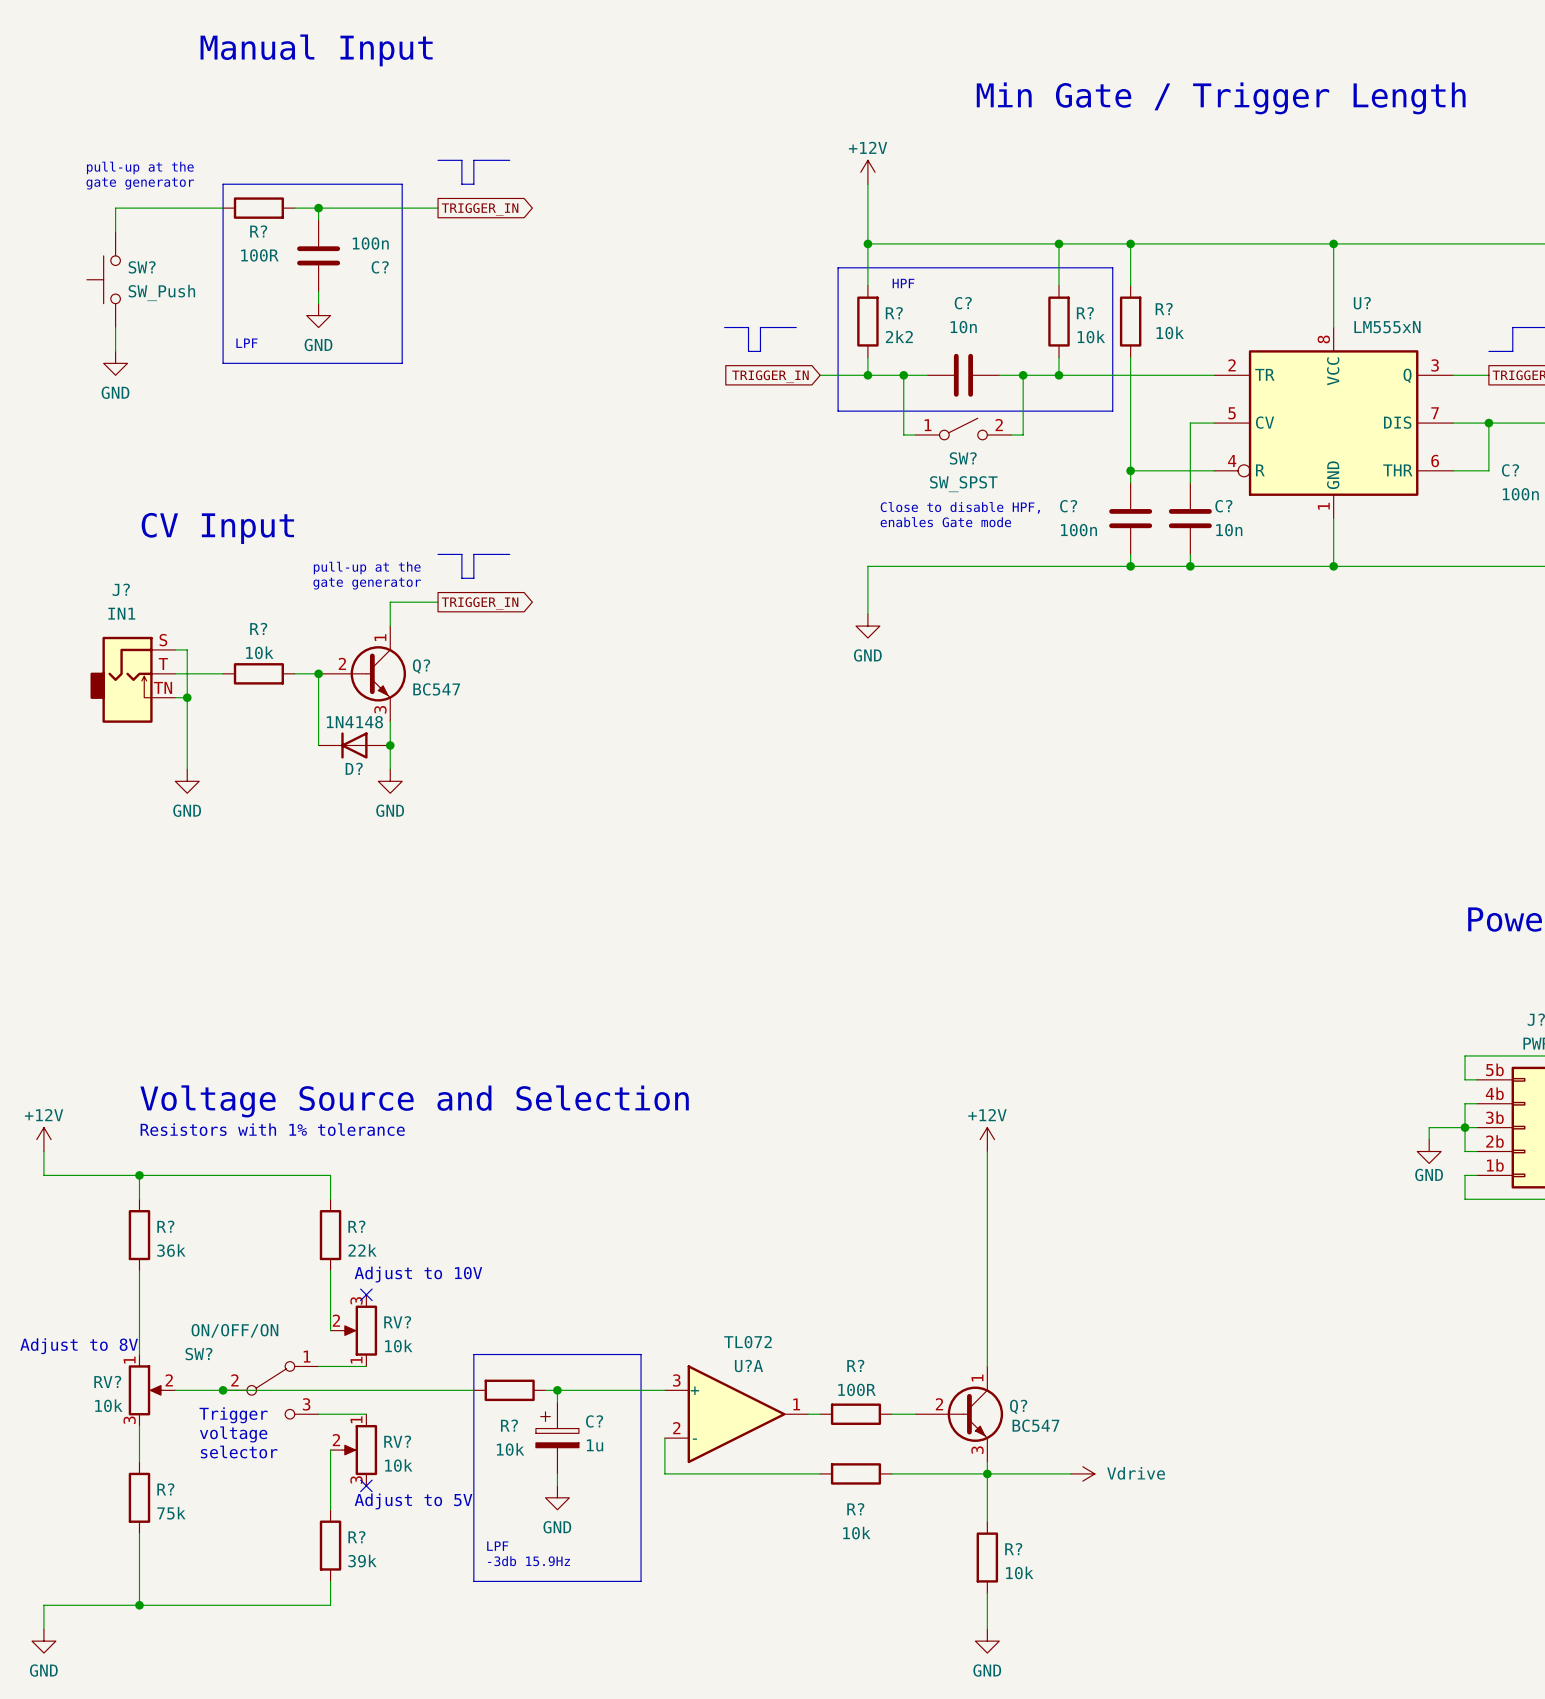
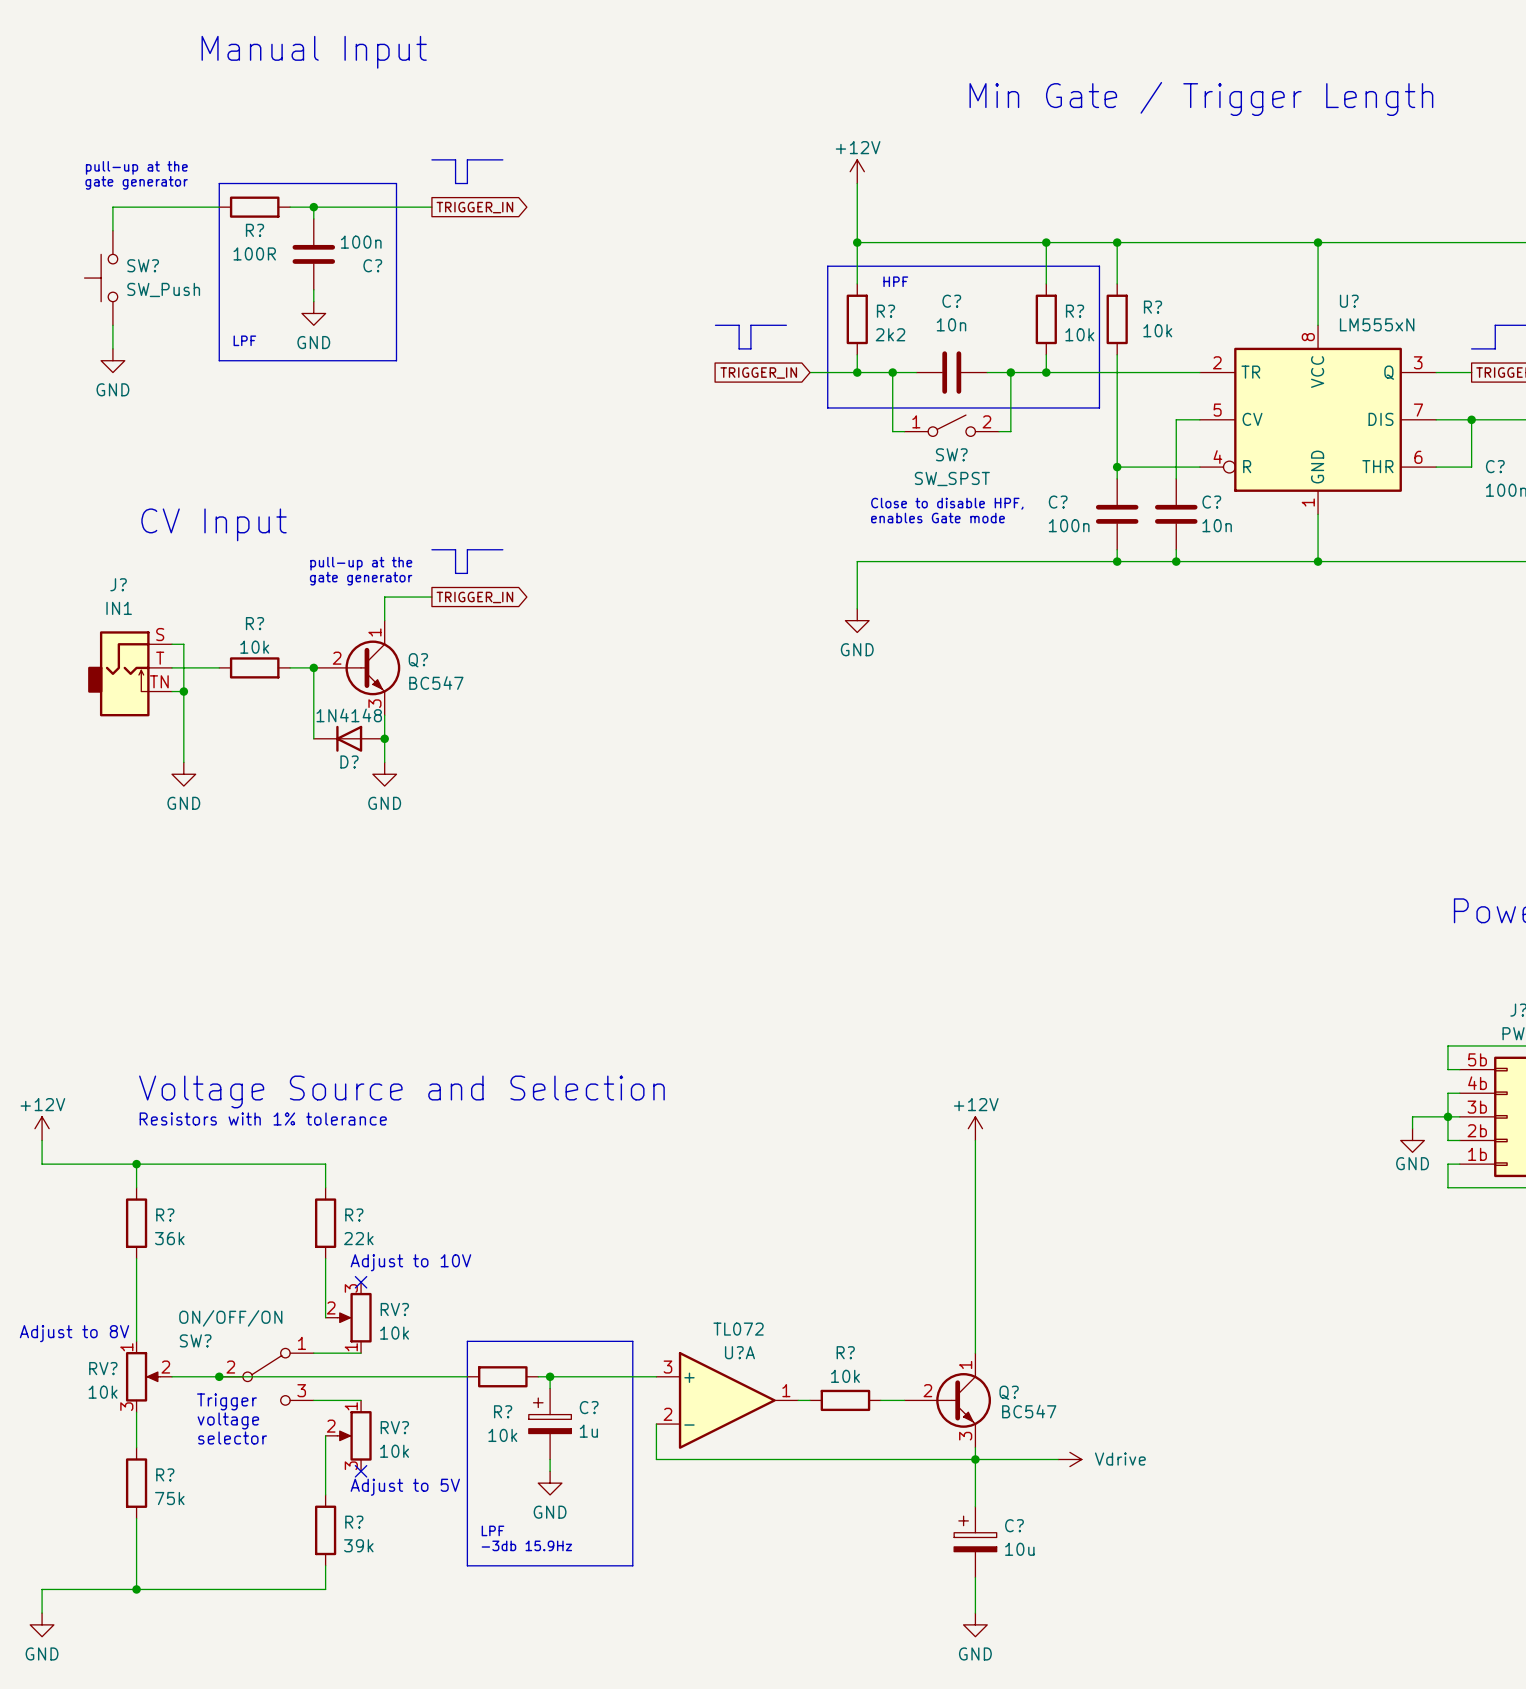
R? value: 100R (856, 1389) -> 10k (845, 1376)
wire: none -> (810, 1459) (880, 1459)
R?: 10k (855, 1473) -> none
R?: 10k (987, 1557) -> none
C?: none -> 10u (975, 1542)

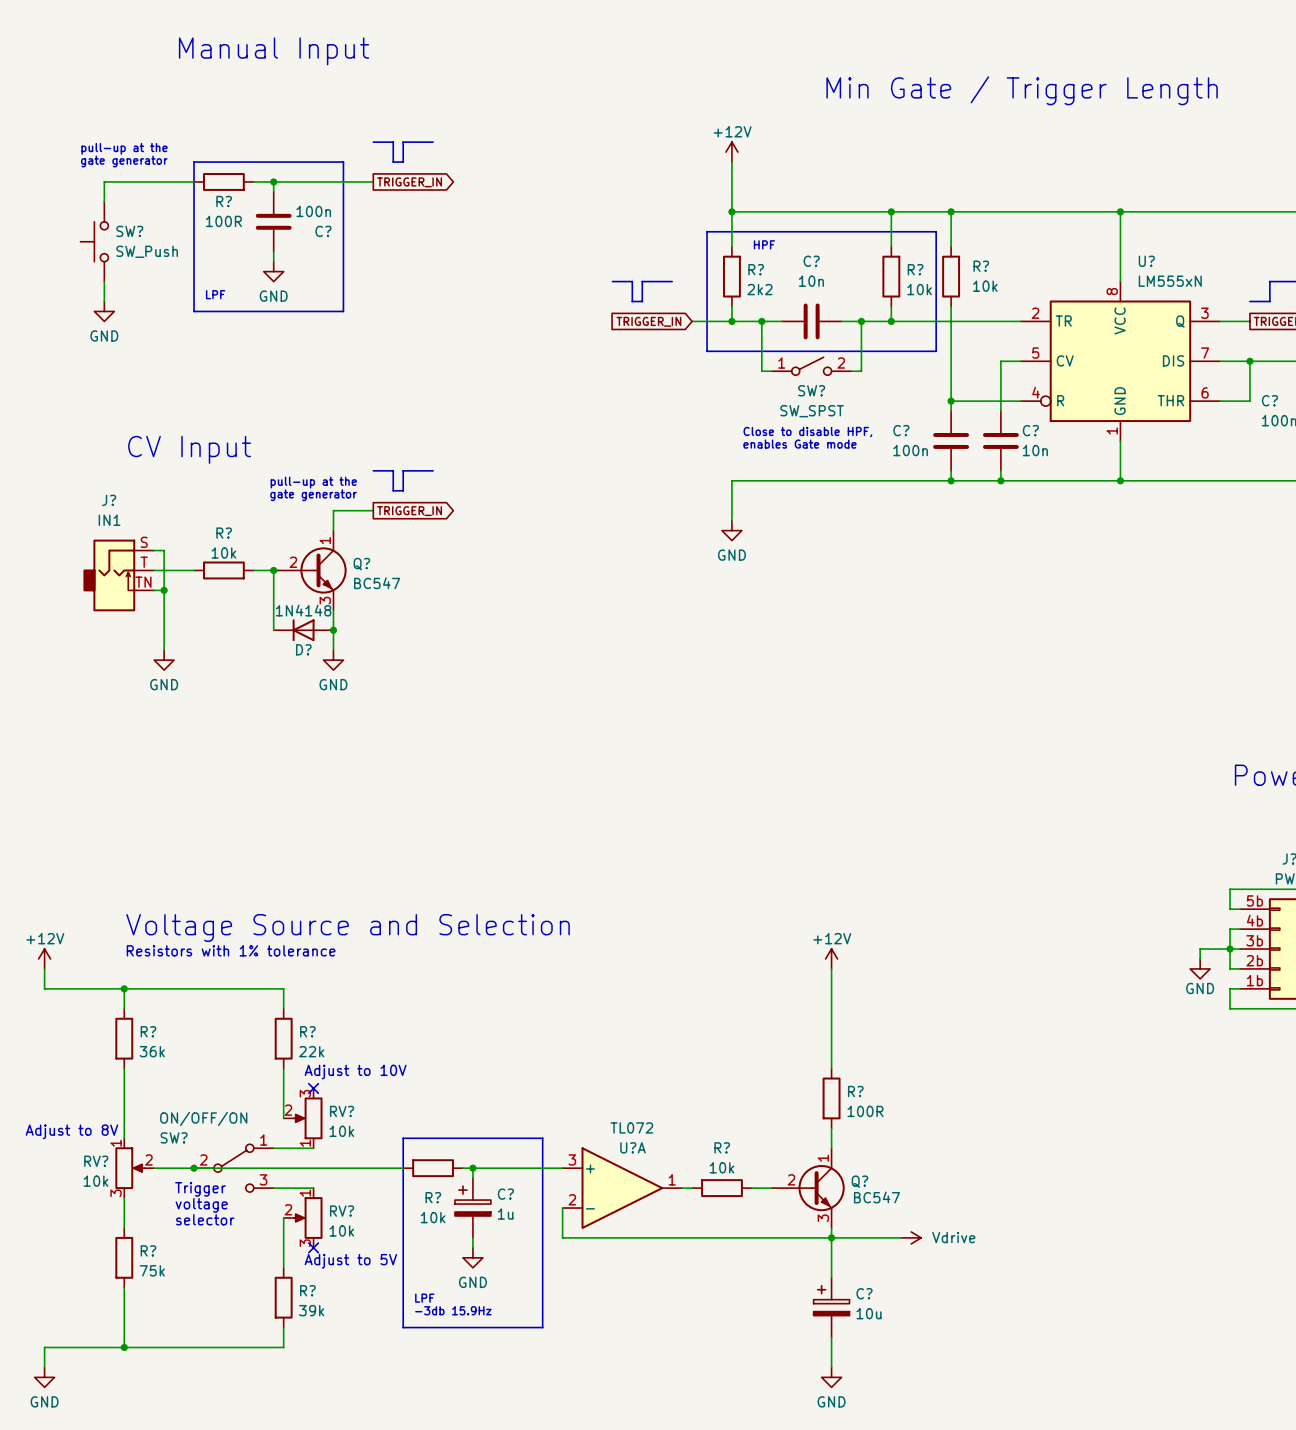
wire: (975, 1258) (975, 1329) -> none
R?: none -> 100R (831, 1098)

